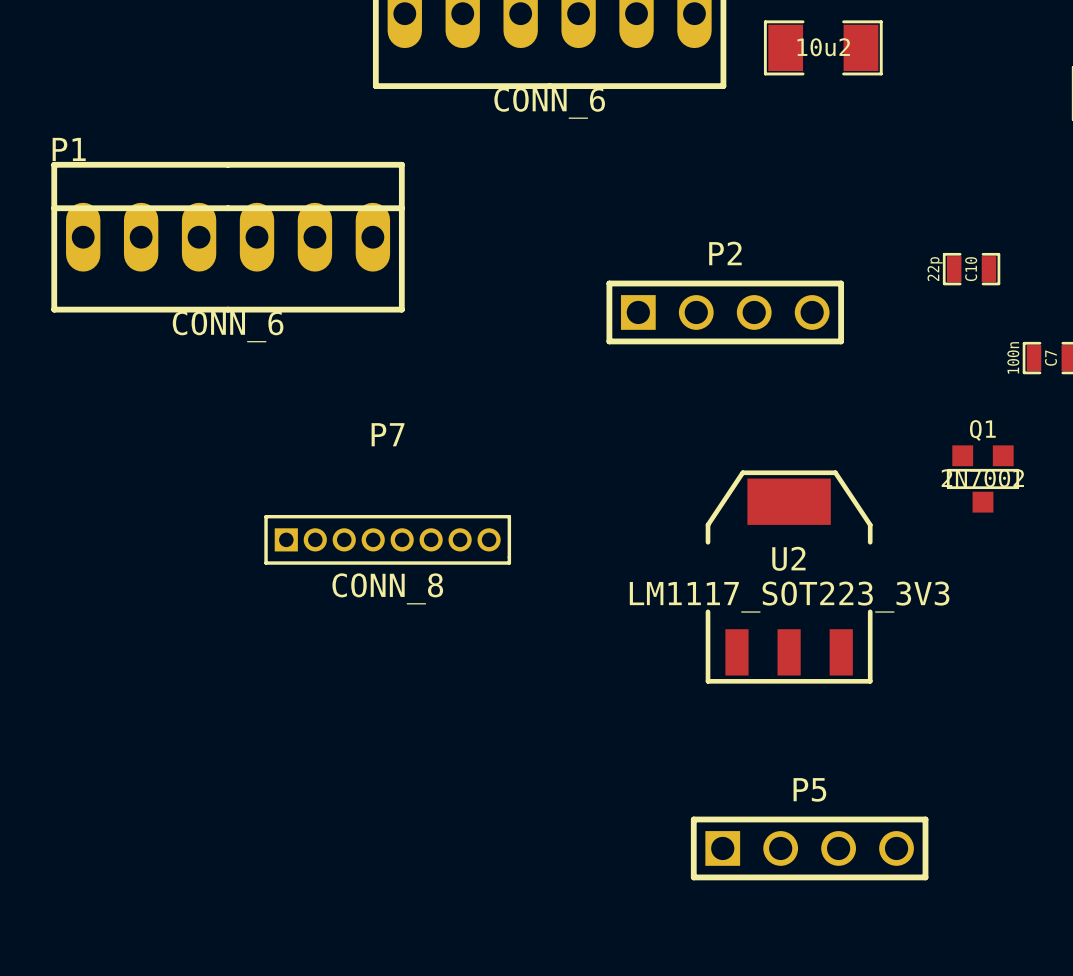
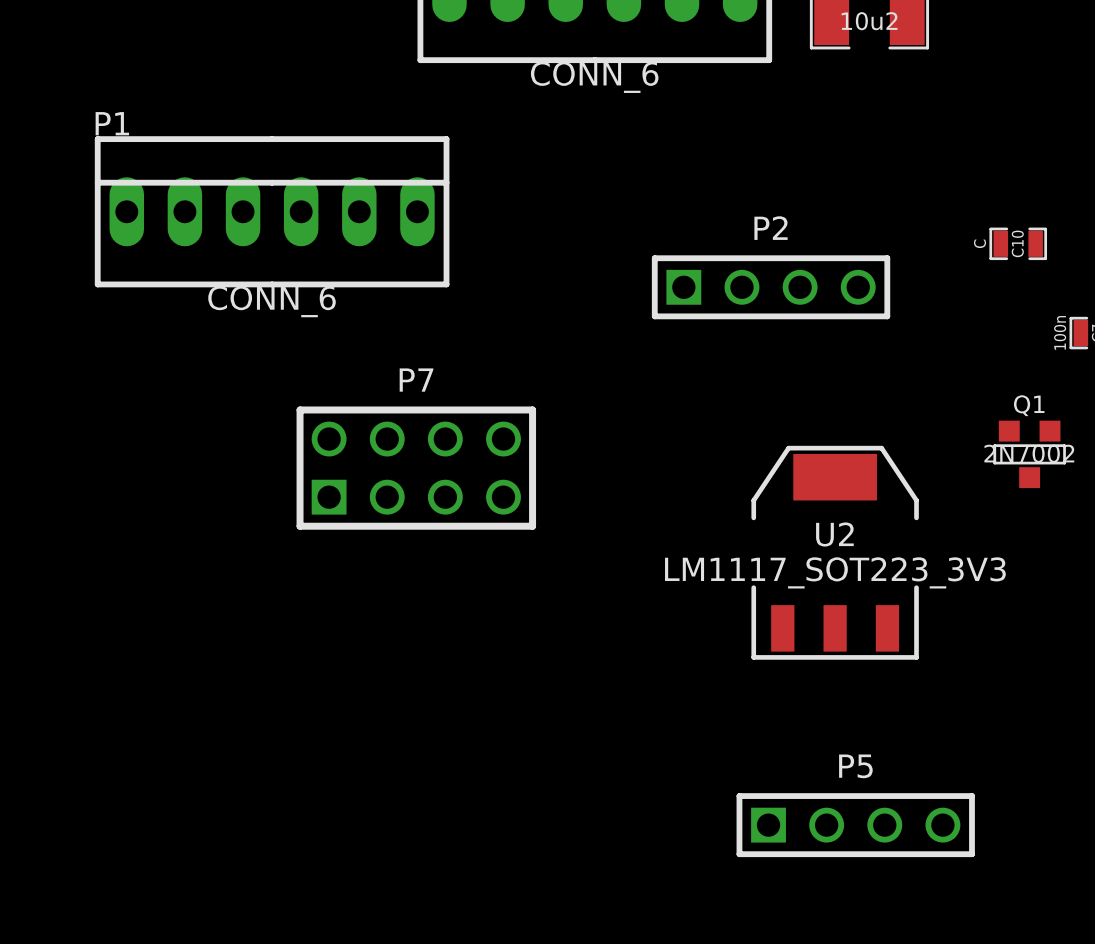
C10 value: 22p (935, 269) -> C (980, 243)
P7 footprint: [264, 514, 512, 565] -> [296, 406, 537, 530]
P7 value: CONN_8 (387, 588) -> none

